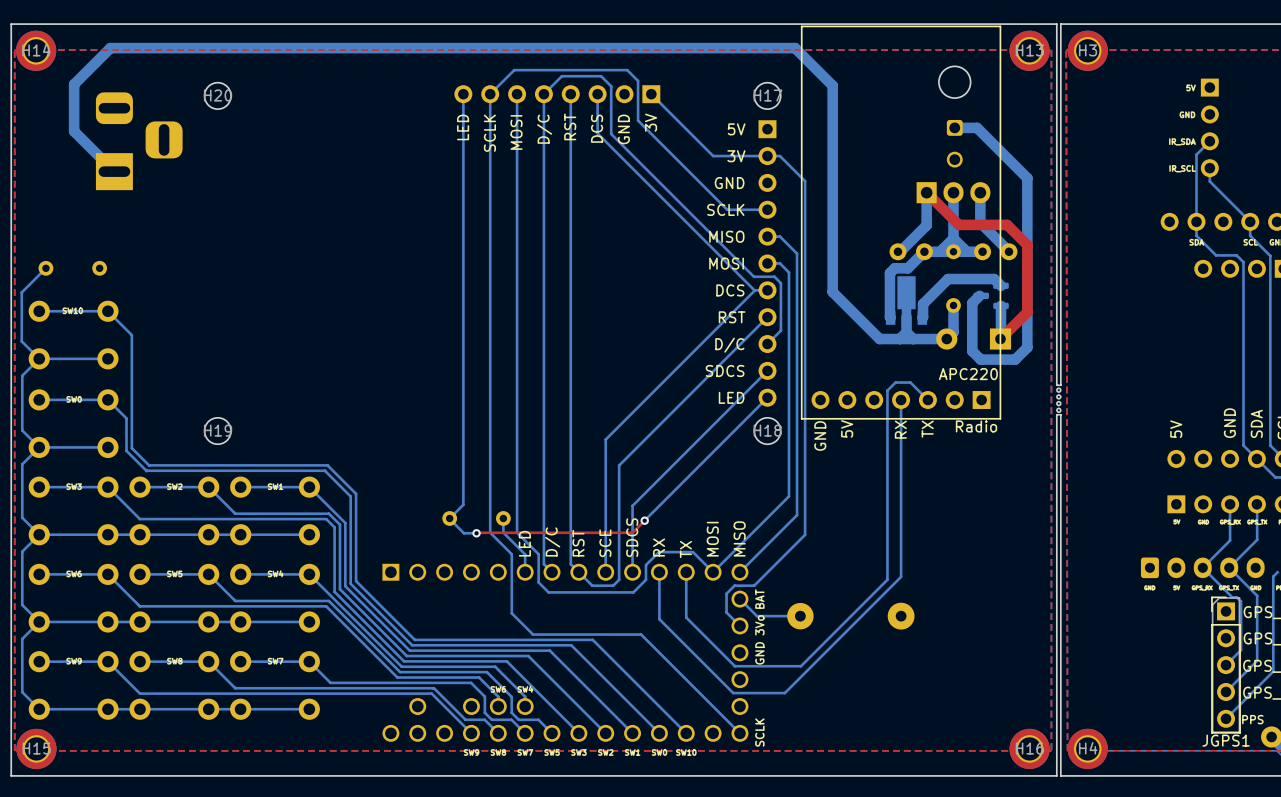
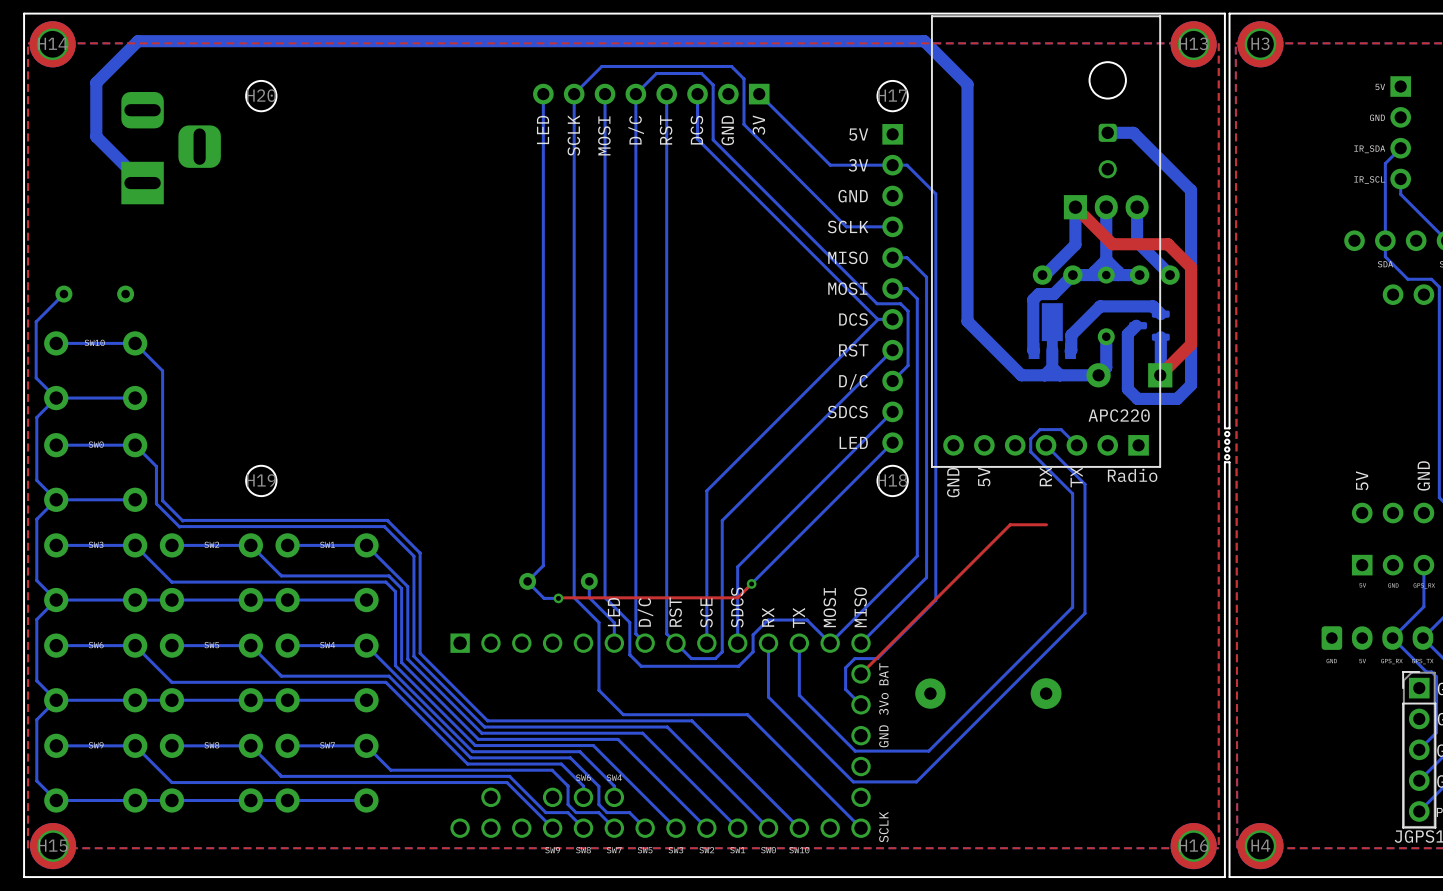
bottom track: (914, 386) (910, 382) (895, 382) (887, 390) (887, 579) (798, 666) -> (1061, 429) (1039, 429) (1030, 438) (1030, 451) (1072, 493) (1072, 607) (928, 751)
bottom track: (901, 400) (901, 576) (784, 693) -> (1046, 445) (1084, 484) (1084, 613) (916, 781) (912, 781)
top track: none -> (1046, 524) (1010, 524) (861, 674)
bottom track: (739, 599) (757, 616) (800, 616) -> none

